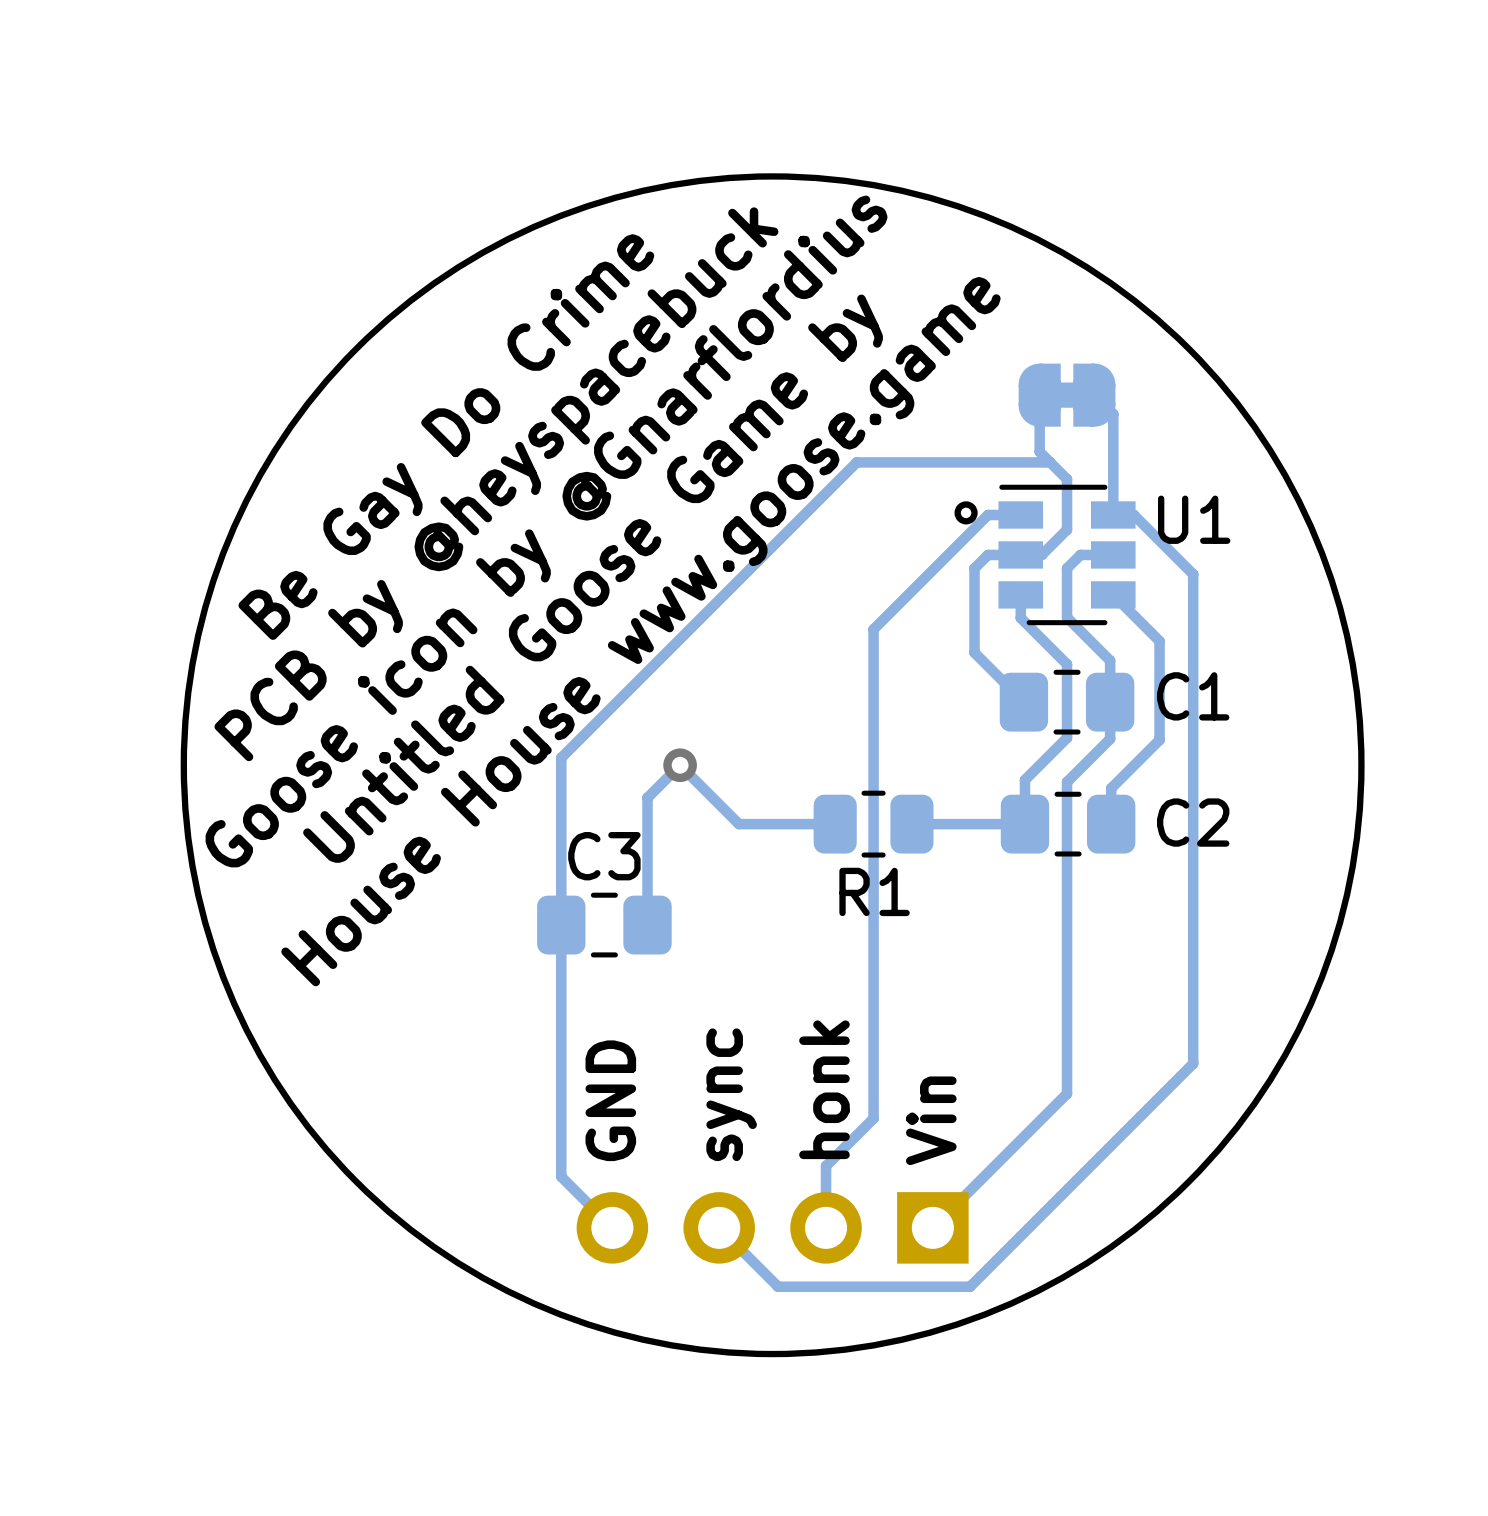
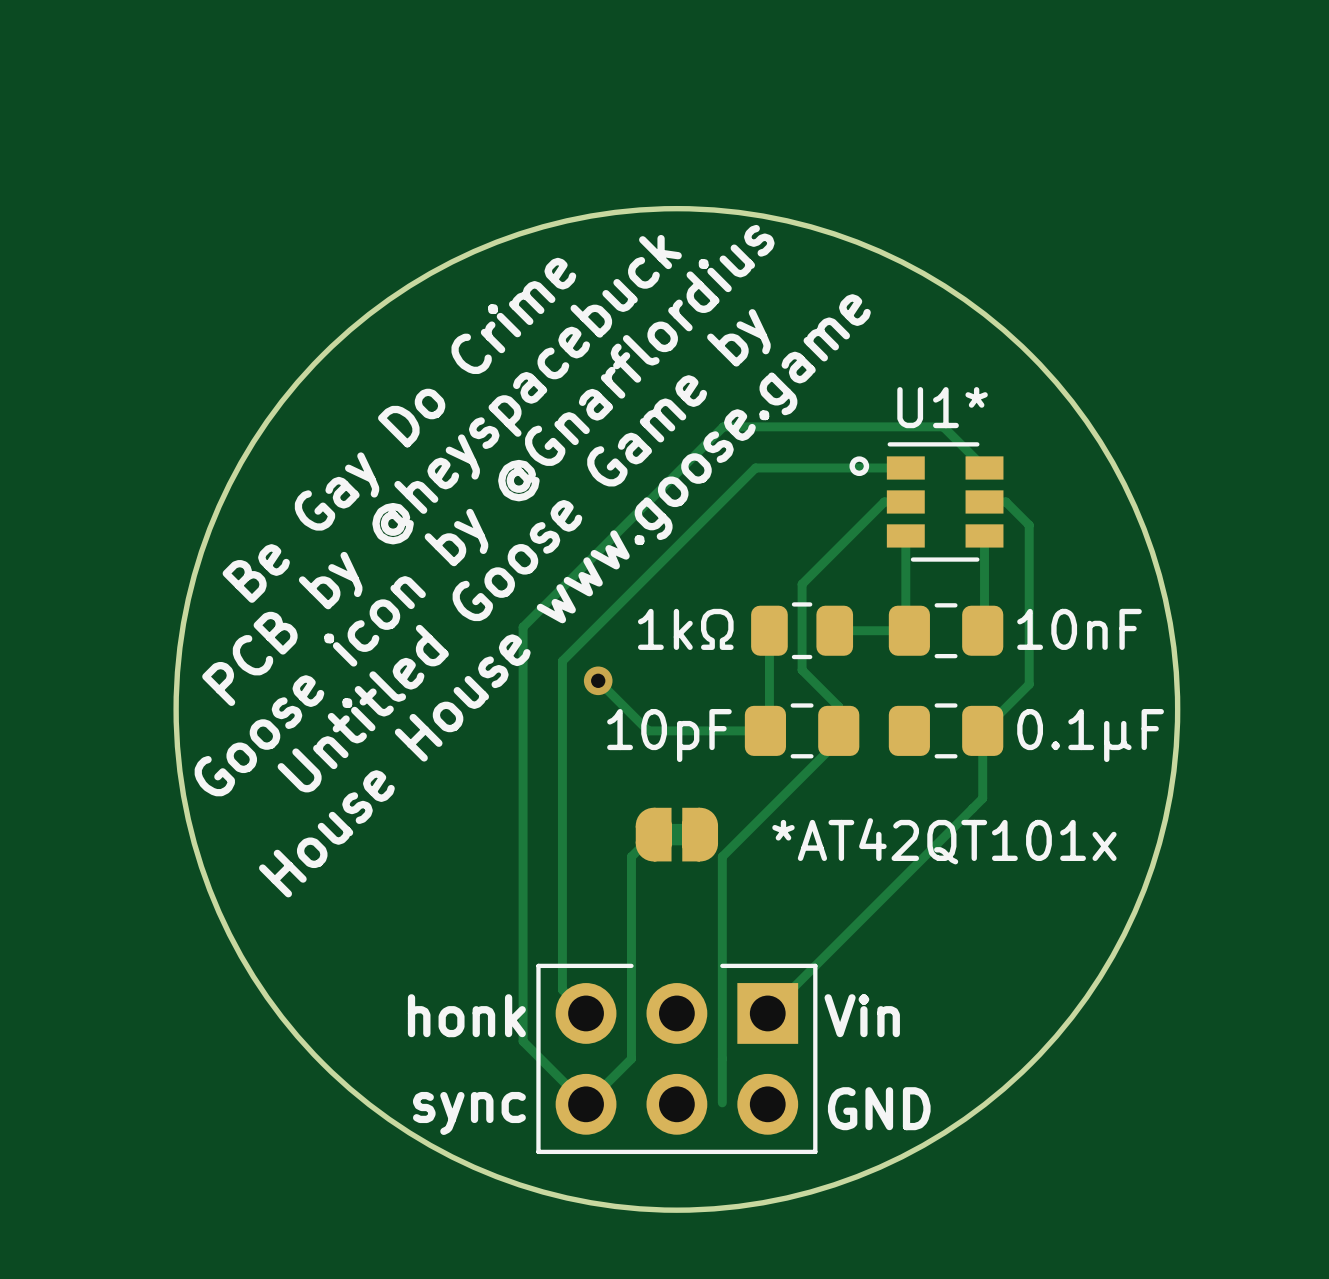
track: (1039, 395) (1039, 451) (1067, 479) (1067, 529) (1041, 554) (987, 554) (974, 568) (974, 652) (1023, 702) -> none
part position: (1067, 395) -> (676, 834)
track: (1094, 395) (1113, 414) (1113, 515) (1133, 515) (1193, 574) (1193, 1063) (970, 1286) (778, 1286) (719, 1227) -> none
text: none -> U1* (942, 407)
track: (1050, 462) (856, 462) (561, 757) (561, 1176) (612, 1227) -> none
track: none -> (905, 467) (755, 467) (562, 661) (562, 989) (586, 1013)
track: none -> (984, 467) (943, 426) (723, 426) (523, 627) (523, 1041) (586, 1104) (631, 1058) (631, 856) (653, 834)
drawing position: (966, 512) -> (859, 466)
track: (1020, 515) (987, 515) (873, 629) (873, 1118) (826, 1166) -> (905, 501) (884, 501) (802, 584) (802, 670) (838, 706) (838, 740) (722, 856) (722, 1050)
U1 name: U1 (1194, 519) -> none
track: none -> (984, 501) (1005, 501) (1029, 525) (1029, 684) (982, 730) (982, 798) (767, 1013)
U1 position: (1067, 554) -> (945, 501)
track: (1113, 554) (1080, 554) (1067, 568) (1067, 617) (1110, 660) (1110, 738) (1067, 782) (1067, 1093) (932, 1227) -> none
track: none -> (905, 535) (905, 627) (909, 630) (834, 630)
track: none -> (984, 535) (984, 628) (982, 630)
track: (1020, 594) (1020, 618) (1067, 664) (1067, 737) (1024, 779) (1024, 828) -> none
track: (1113, 594) (1159, 641) (1159, 740) (1111, 788) (1111, 828) -> none
text: none -> 1kΩ (685, 629)
text: none -> 10nF (1079, 629)
track: none -> (769, 630) (769, 726) (765, 730) (648, 730) (598, 680)
part: none -> (802, 630)
C1 name: C1 (1193, 696) -> none
C1 position: (1067, 702) -> (946, 630)
via position: (680, 765) -> (598, 680)
part: none -> (802, 730)
text: none -> 10pF (669, 735)
text: none -> 0.1μF (1090, 735)
C2 name: C2 (1193, 822) -> none
track: (830, 824) (738, 824) (680, 765) (647, 797) (647, 925) -> none
R1: (873, 824) -> none
track: (1024, 824) (916, 824) -> none
C2 position: (1068, 824) -> (946, 730)
text: none -> *AT42QT101x (944, 841)
C3: (604, 925) -> none
text rotation: 0° (824, 1089) -> 90° clockwise (466, 1015)
text position: honk (824, 1089) -> honk (466, 1015)
text rotation: 0° (731, 1094) -> 90° clockwise (469, 1113)
text position: sync (731, 1094) -> sync (469, 1113)
text rotation: 0° (610, 1100) -> 90° clockwise (879, 1108)
text position: GND (610, 1100) -> GND (879, 1108)
text rotation: 0° (931, 1120) -> 90° clockwise (862, 1015)
part: none -> (676, 1058)
part: (772, 1227) -> none

